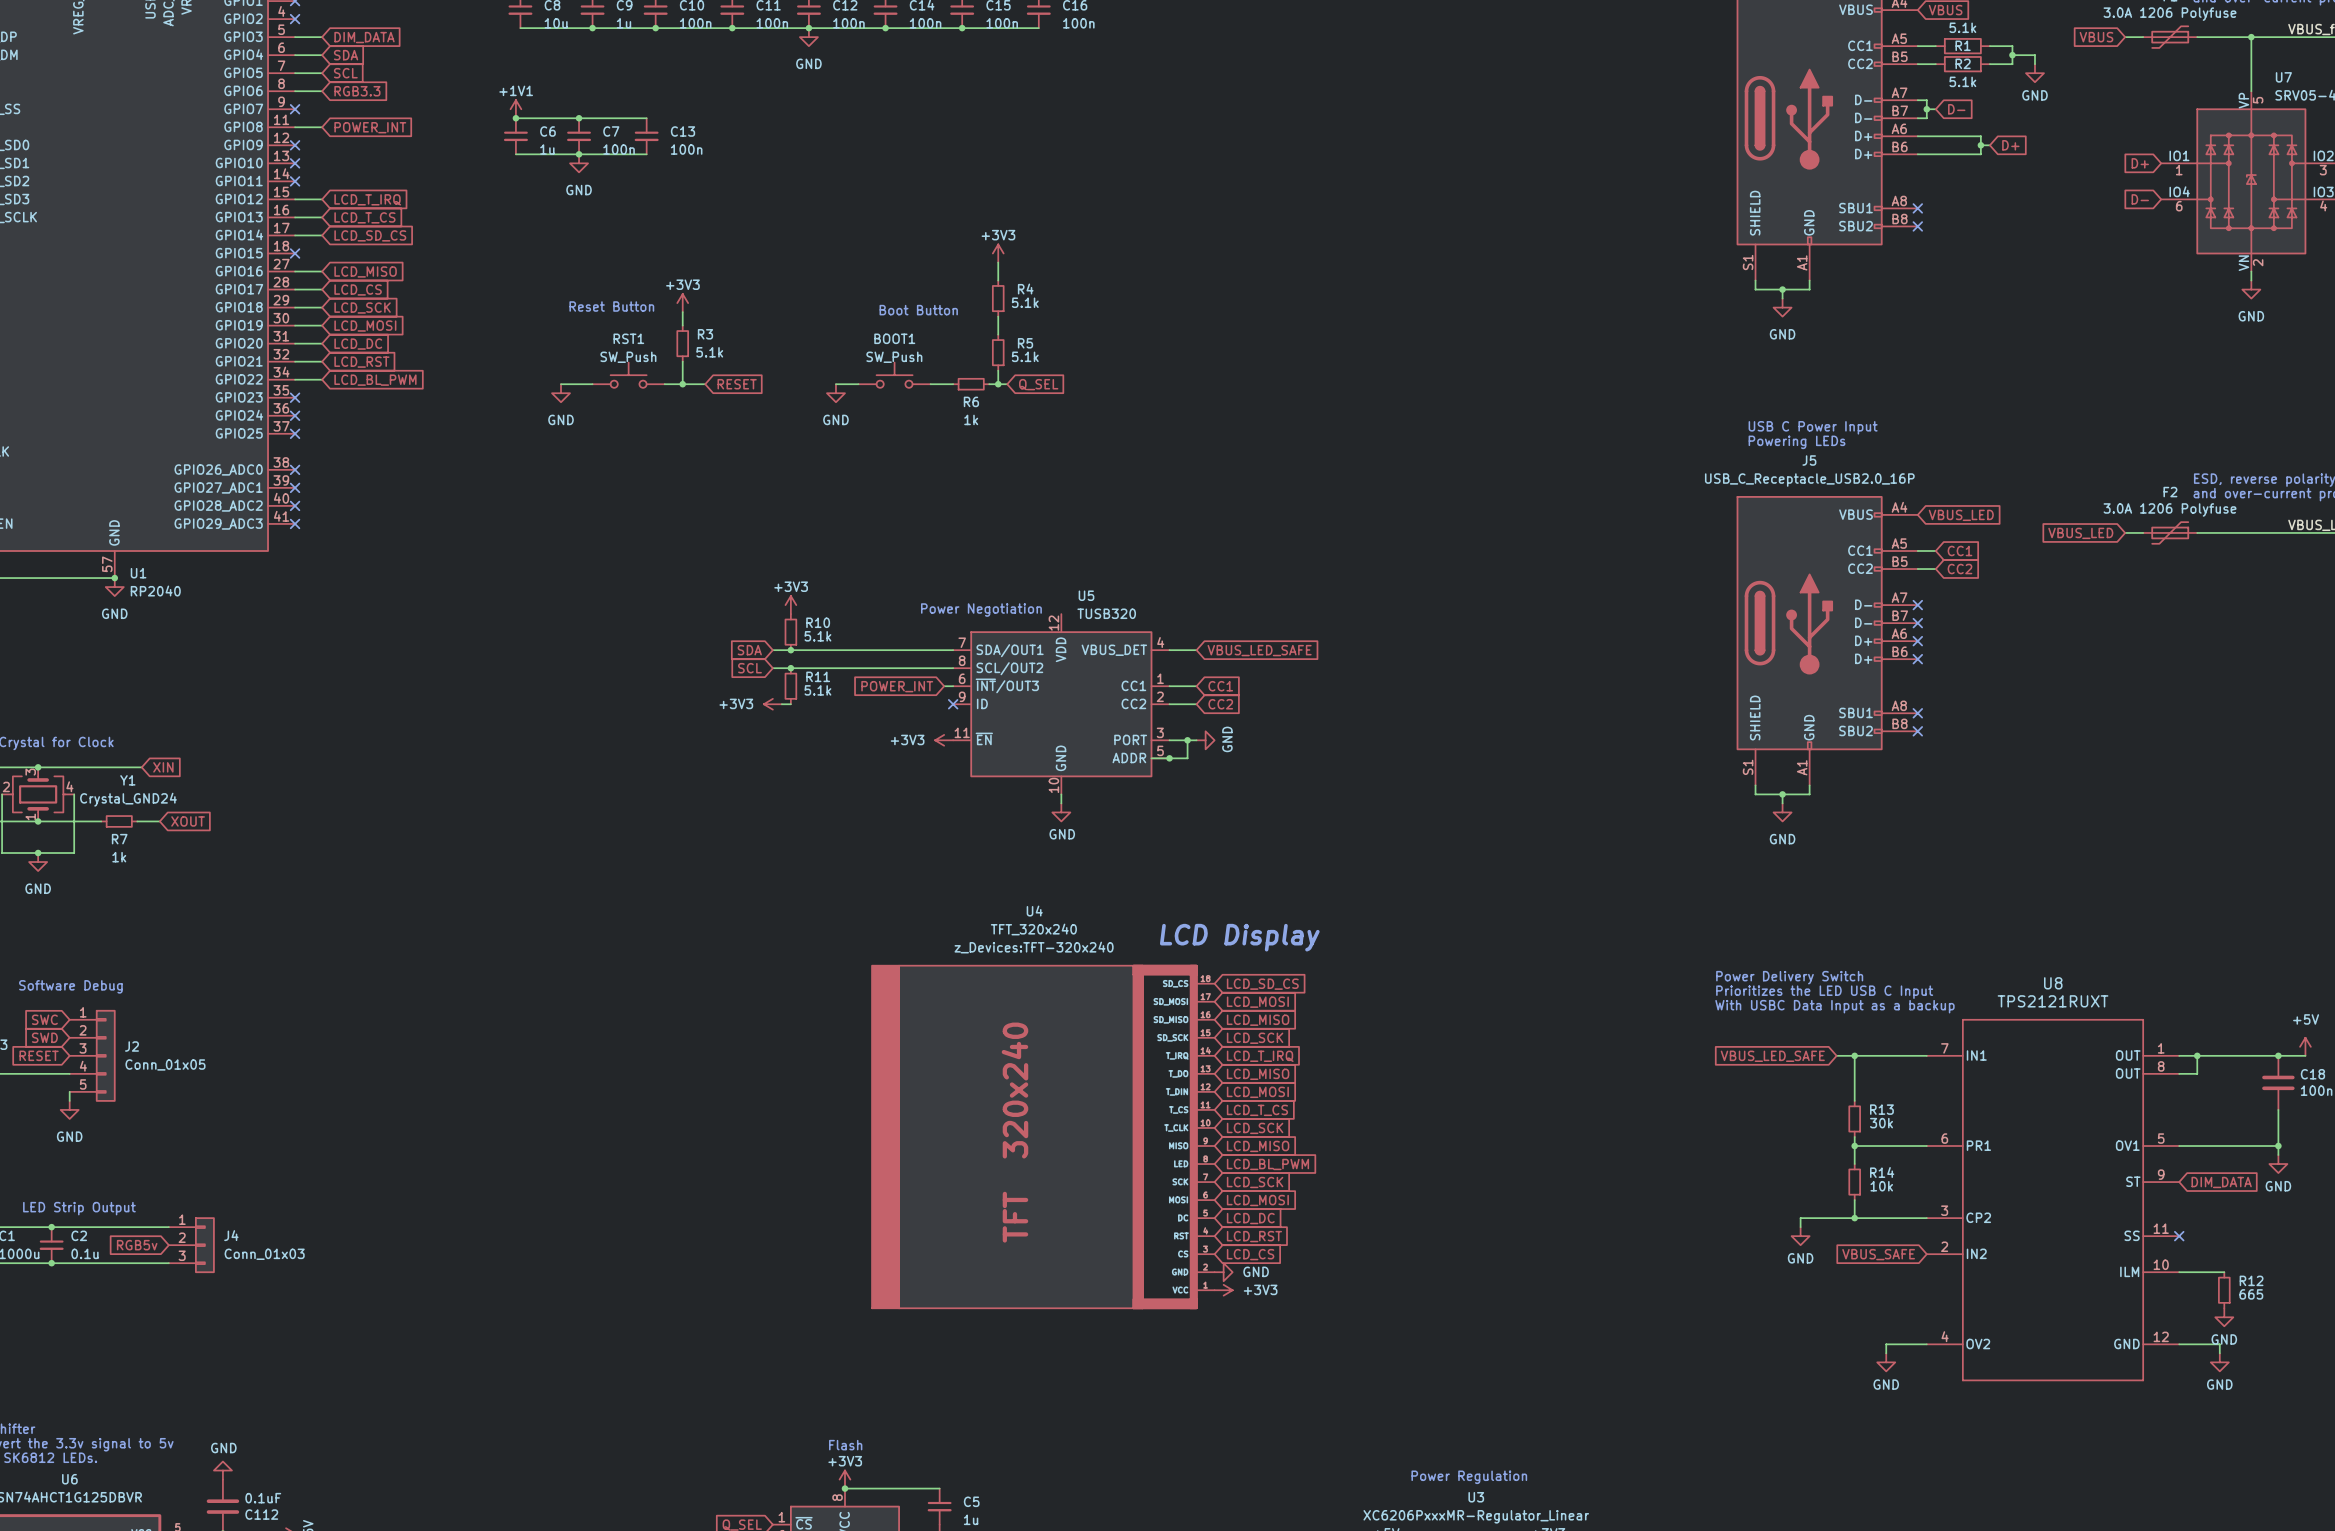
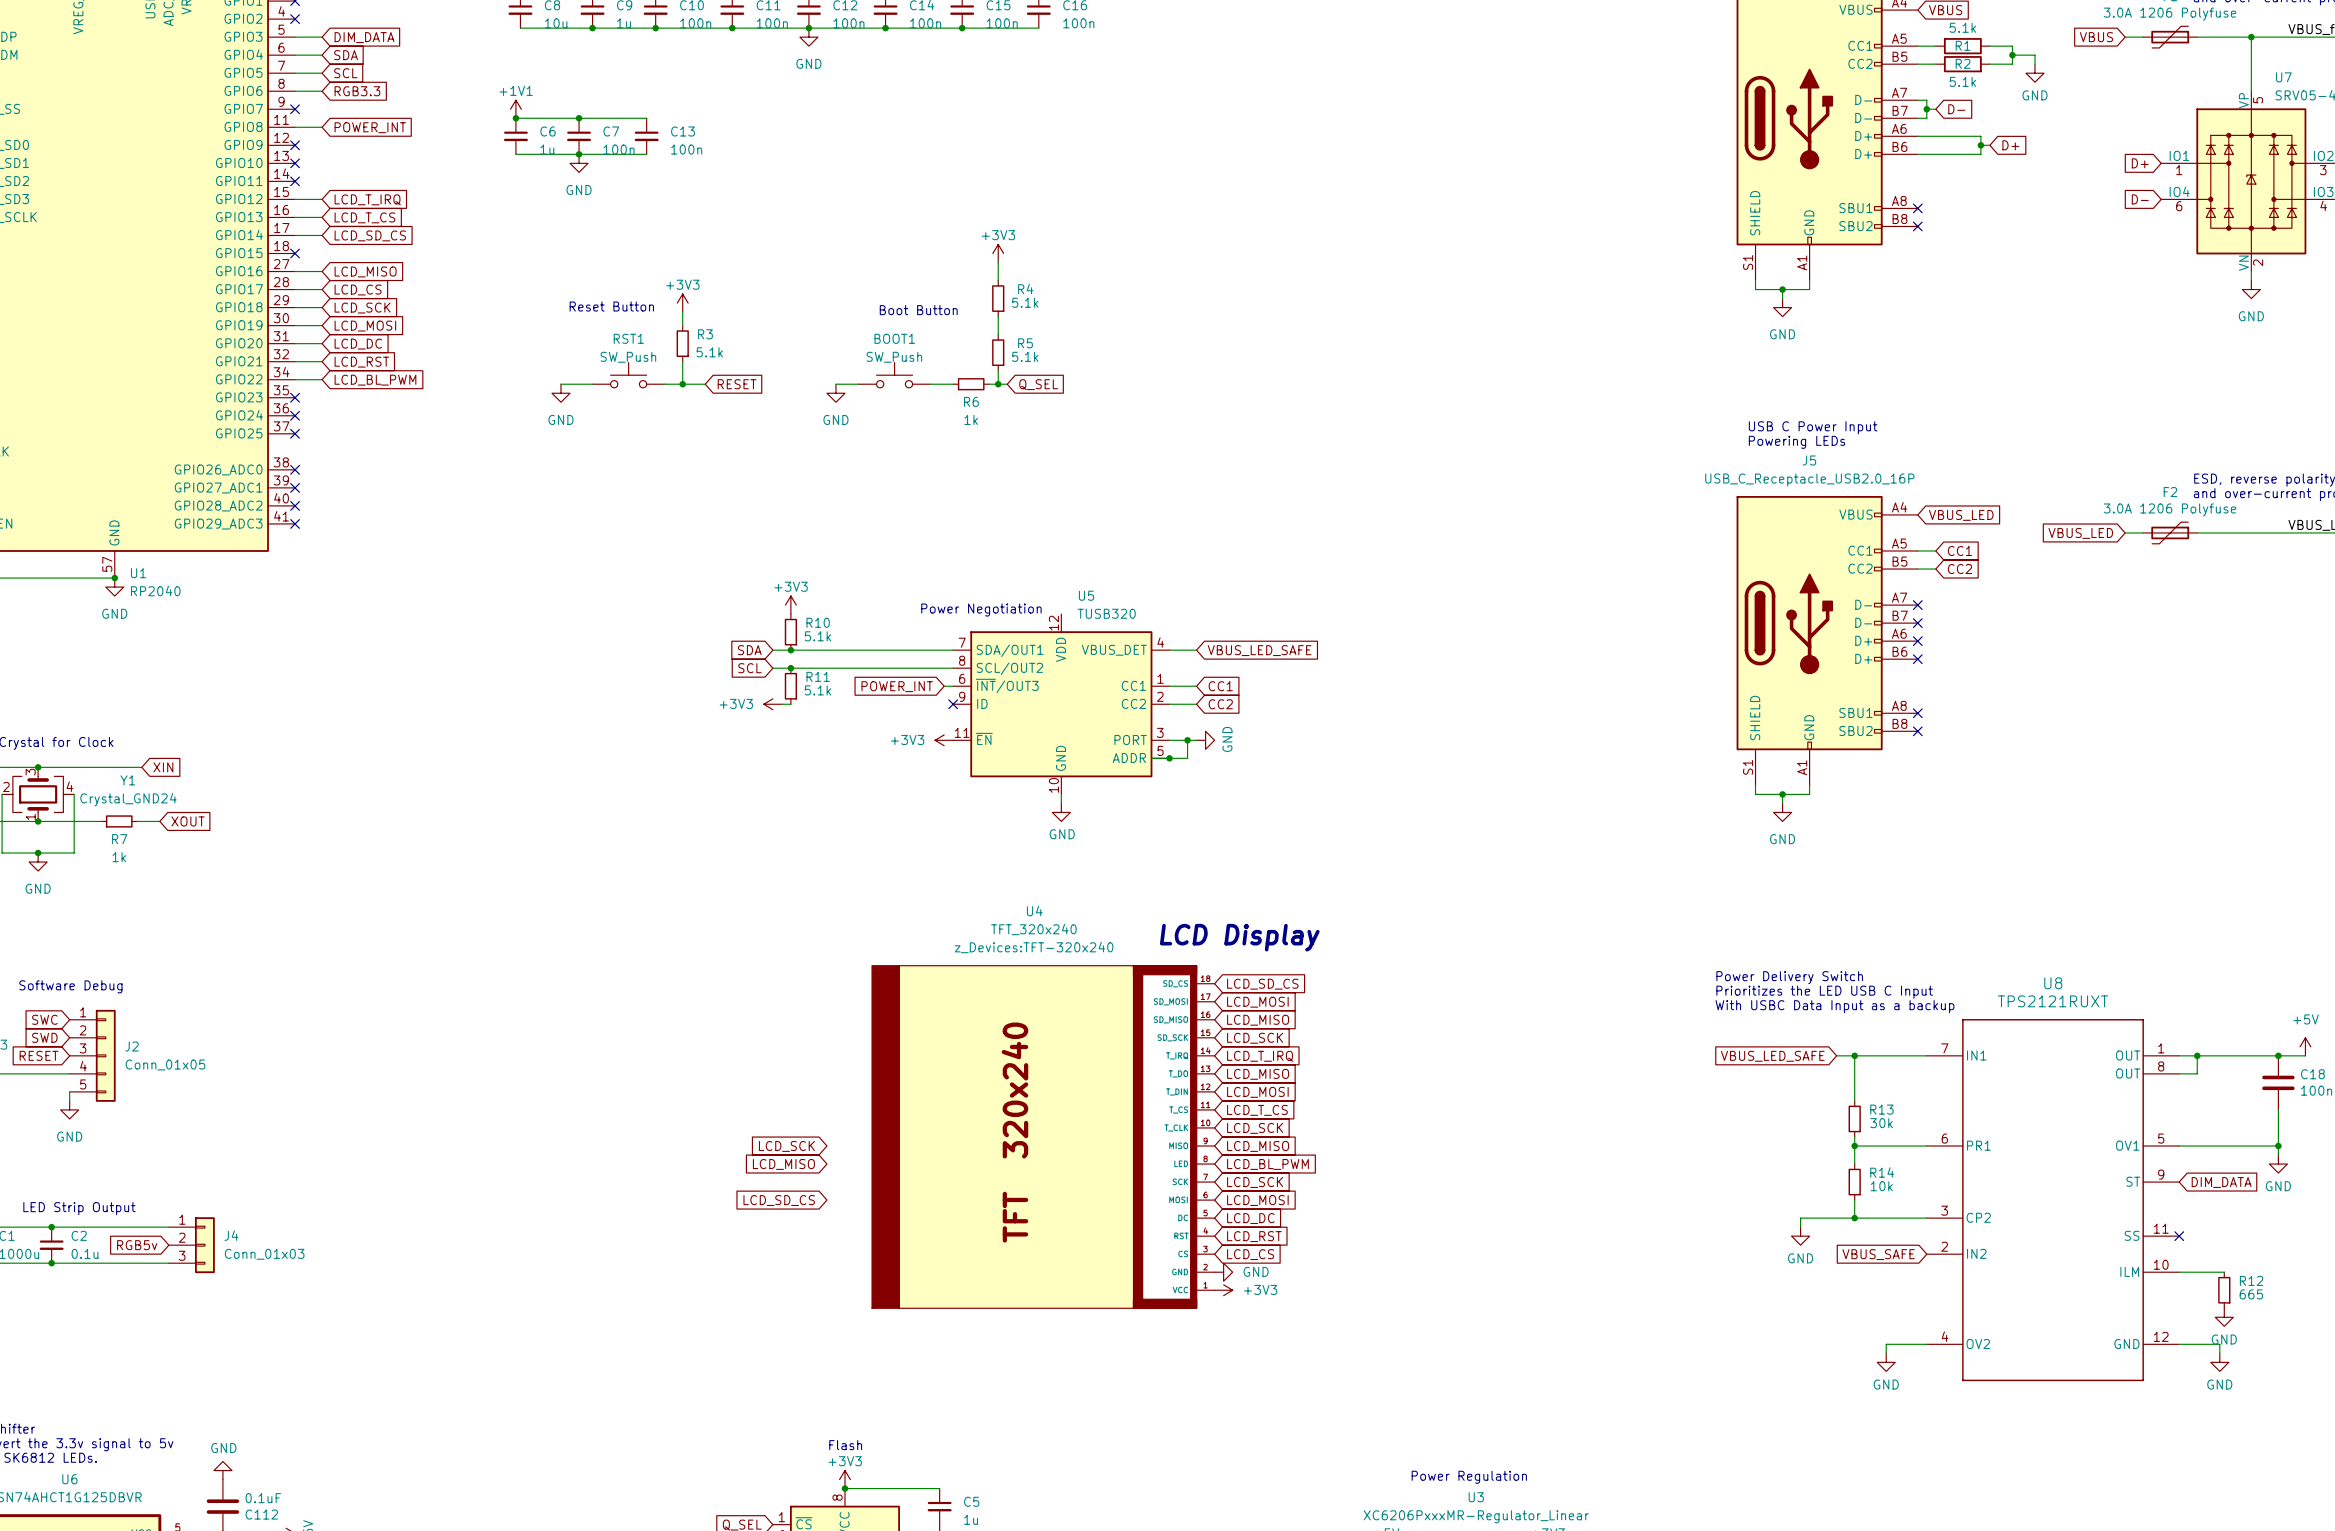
global label: none -> LCD_SCK (786, 1146)
global label: none -> LCD_MISO (783, 1164)
global label: none -> LCD_SD_CS (779, 1200)

